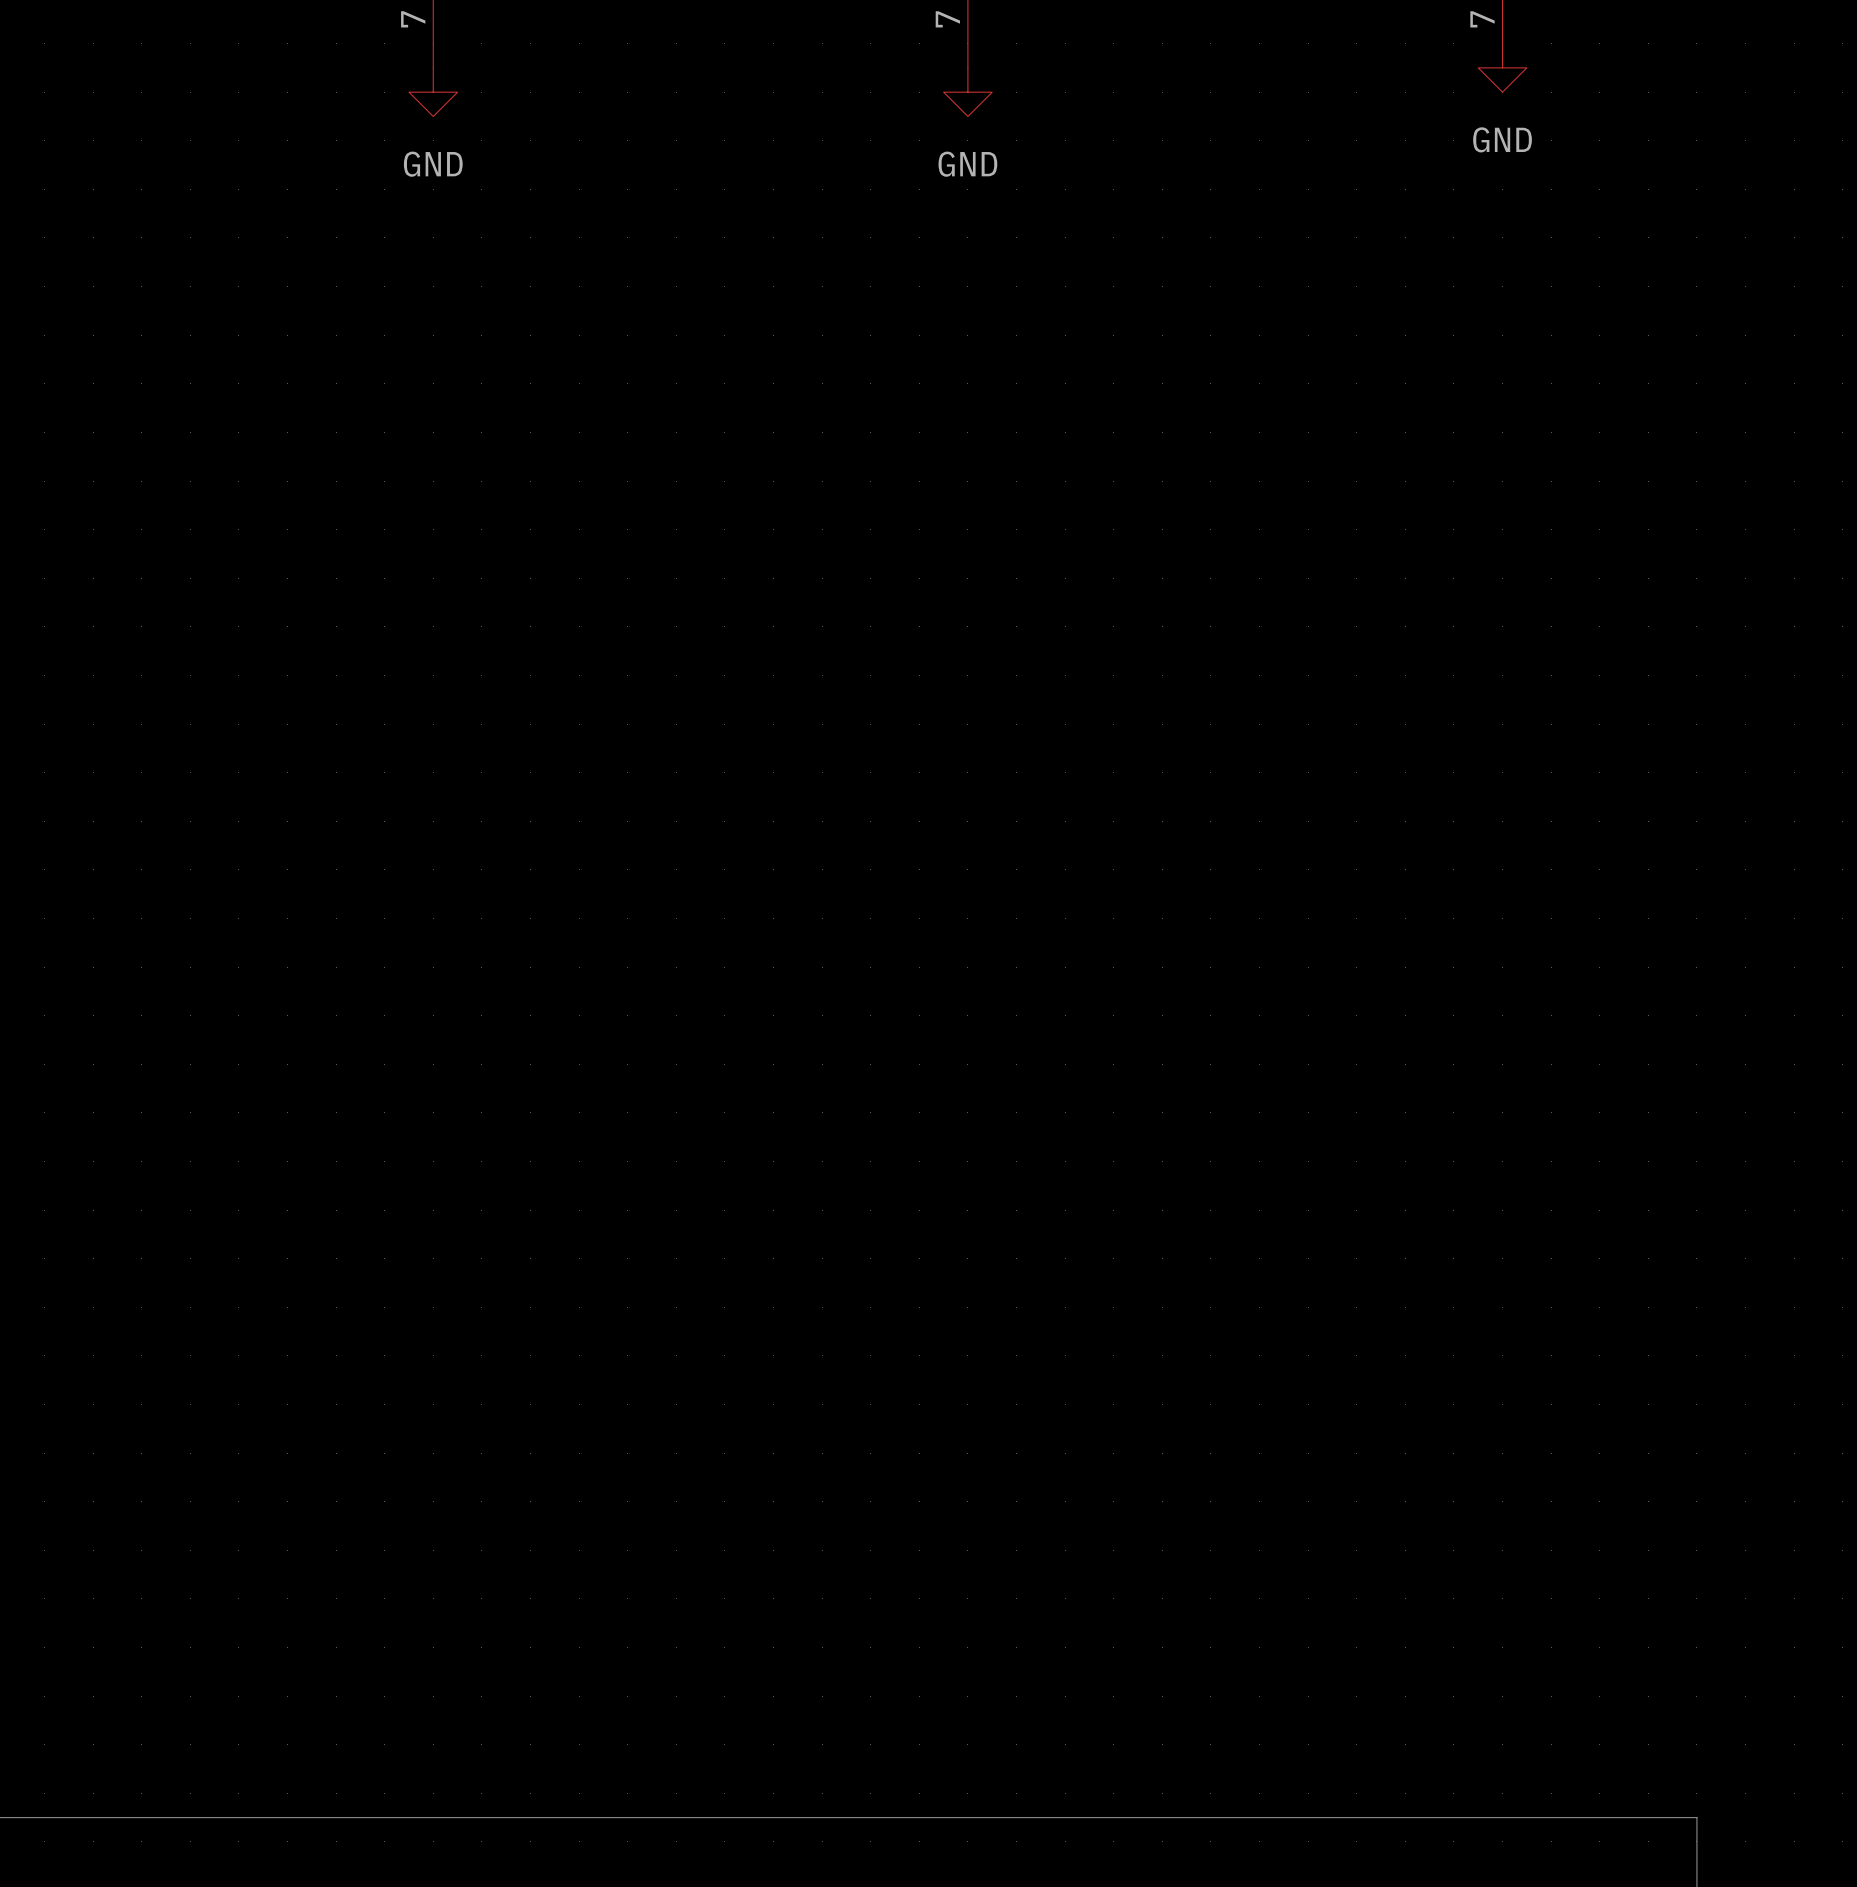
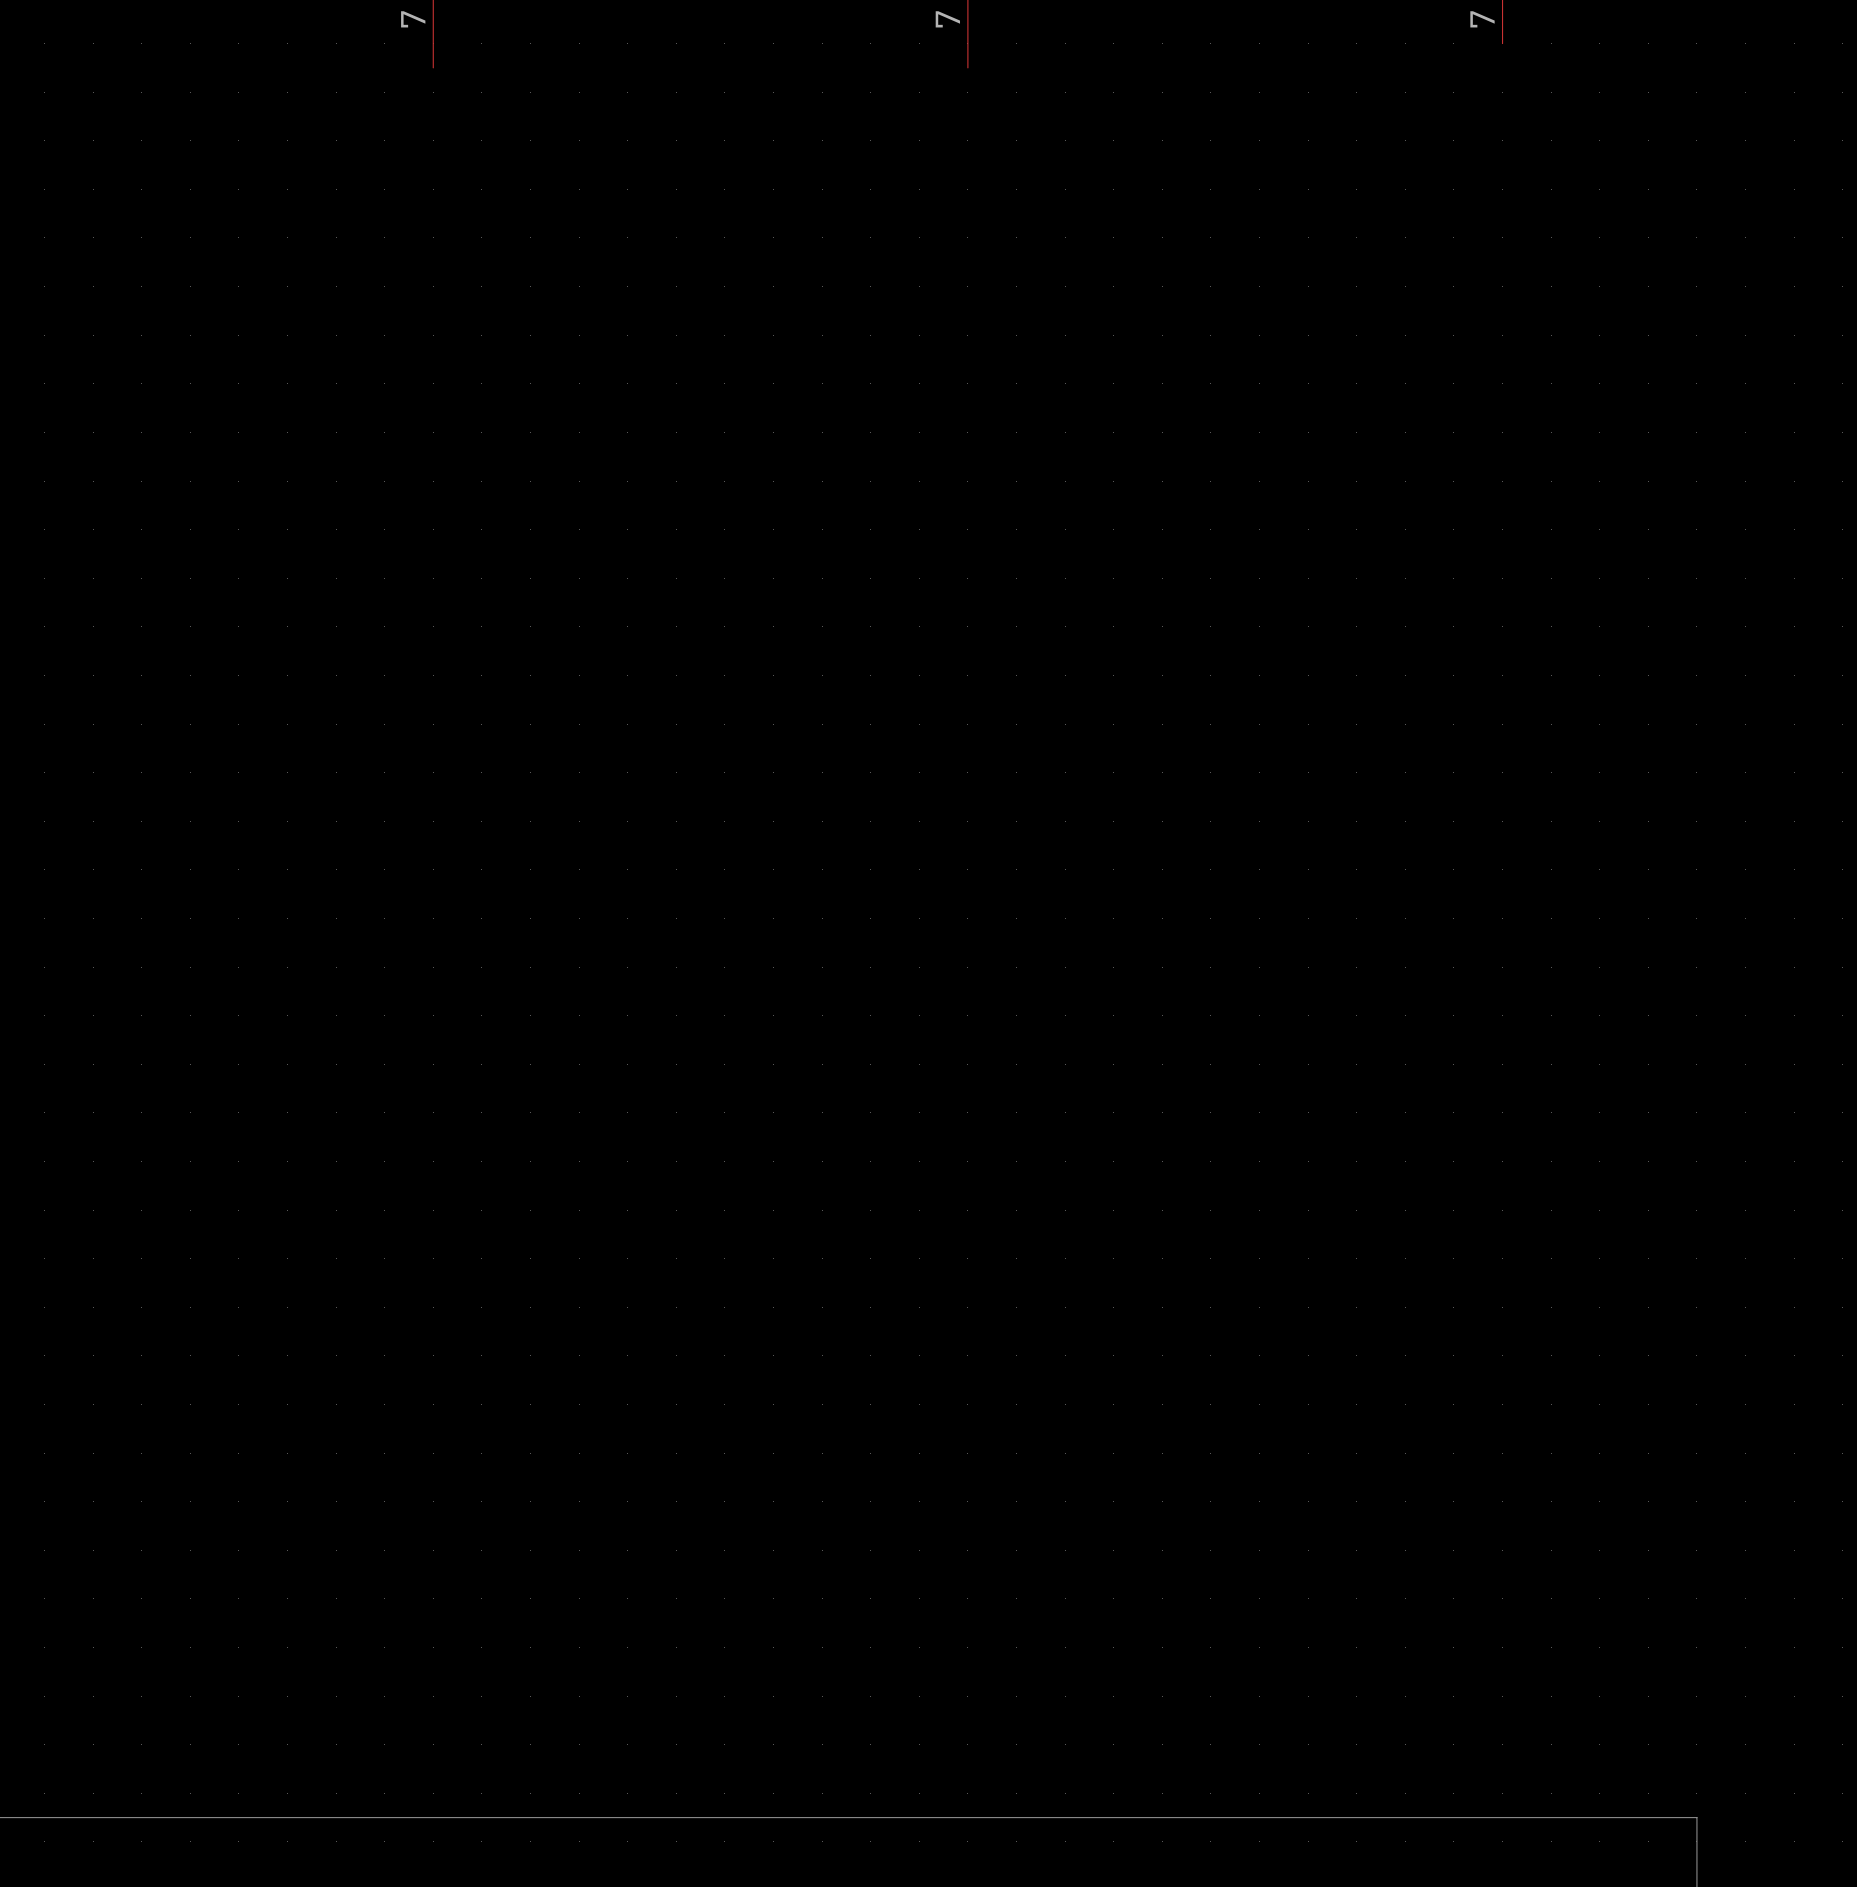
power symbol: GND (1502, 67) -> none
power symbol: GND (433, 92) -> none
power symbol: GND (967, 92) -> none

